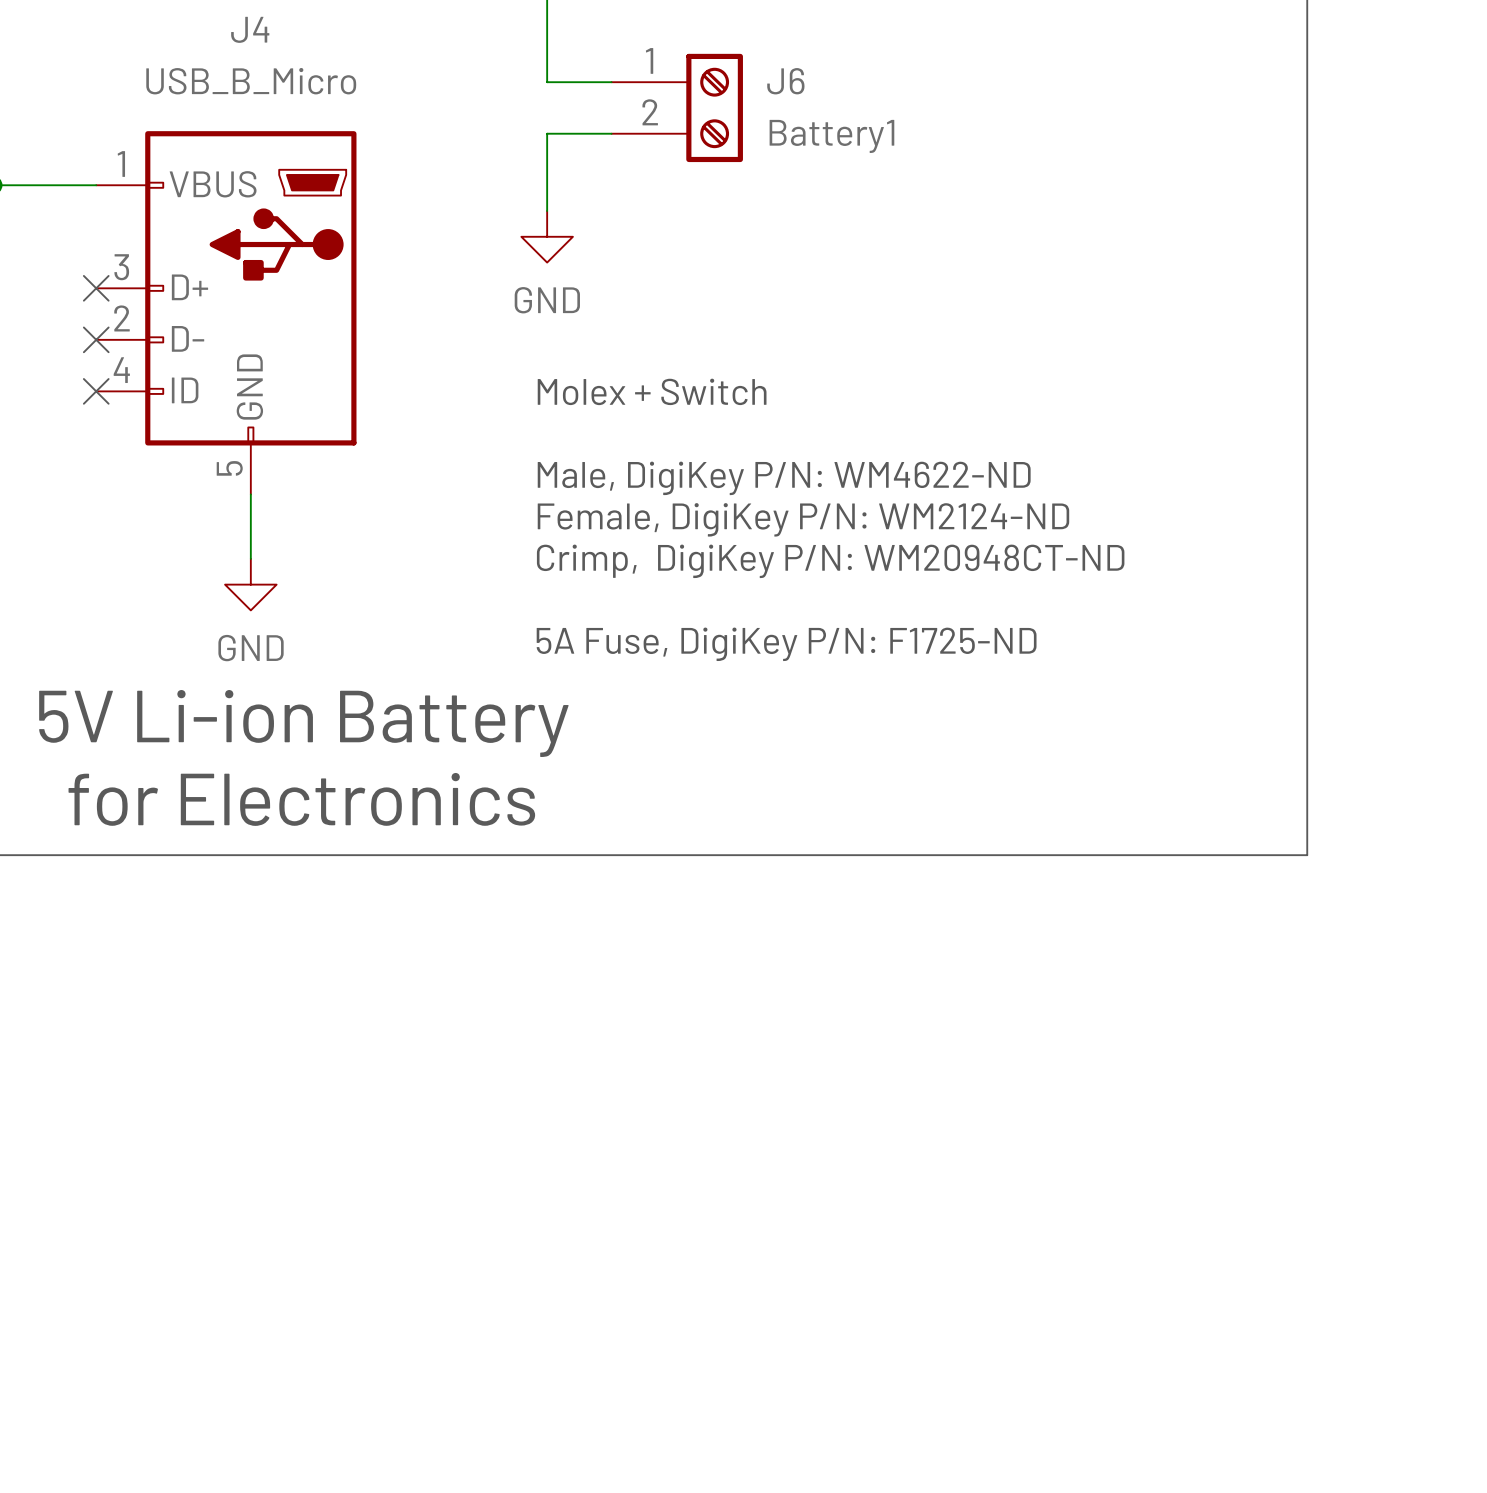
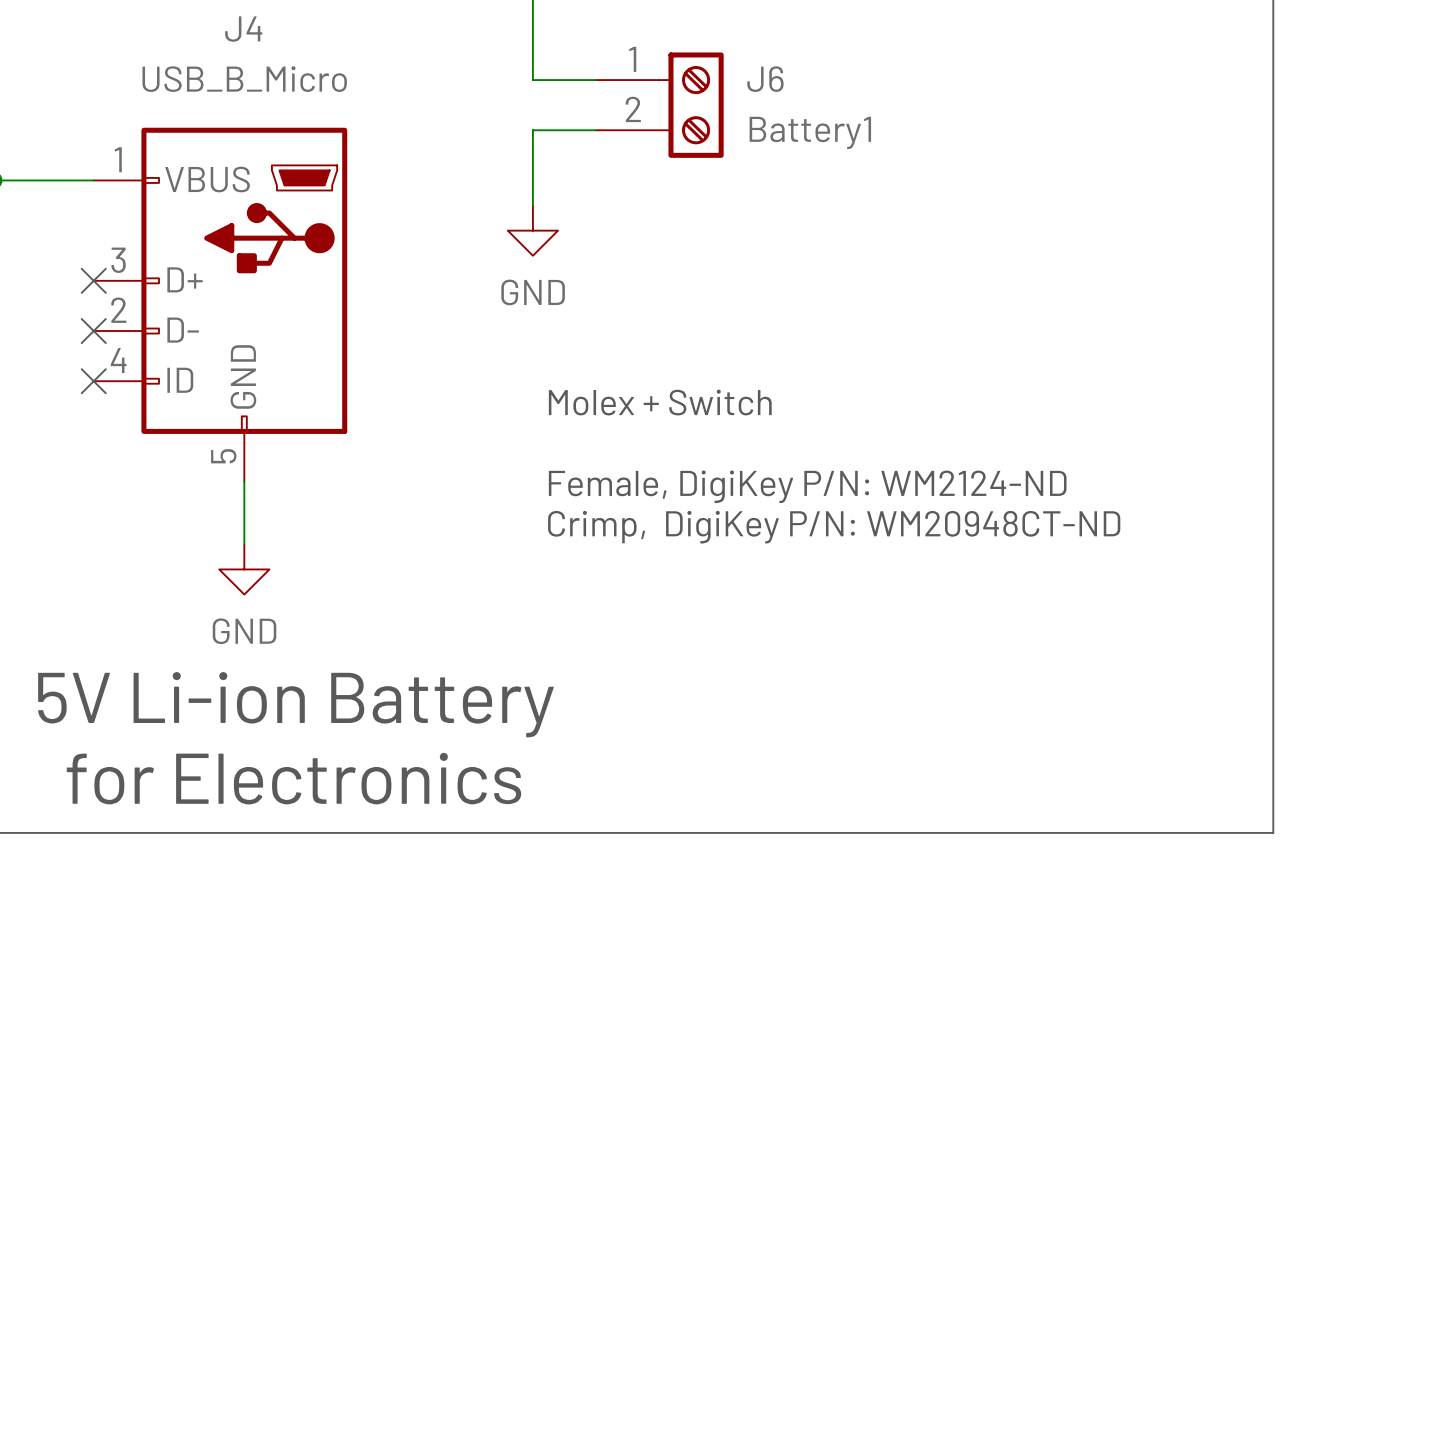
text position: Molex + Switch (652, 391) -> Molex + Switch (660, 402)
text: Male, DigiKey P/N: WM4622-ND (784, 478) -> none
text position: Female, DigiKey P/N: WM2124-ND (803, 519) -> Female, DigiKey P/N: WM2124-ND (807, 486)
text position: Crimp, DigiKey P/N: WM20948CT-ND (830, 561) -> Crimp, DigiKey P/N: WM20948CT-ND (834, 527)
text: 5A Fuse, DigiKey P/N: F1725-ND (786, 644) -> none

